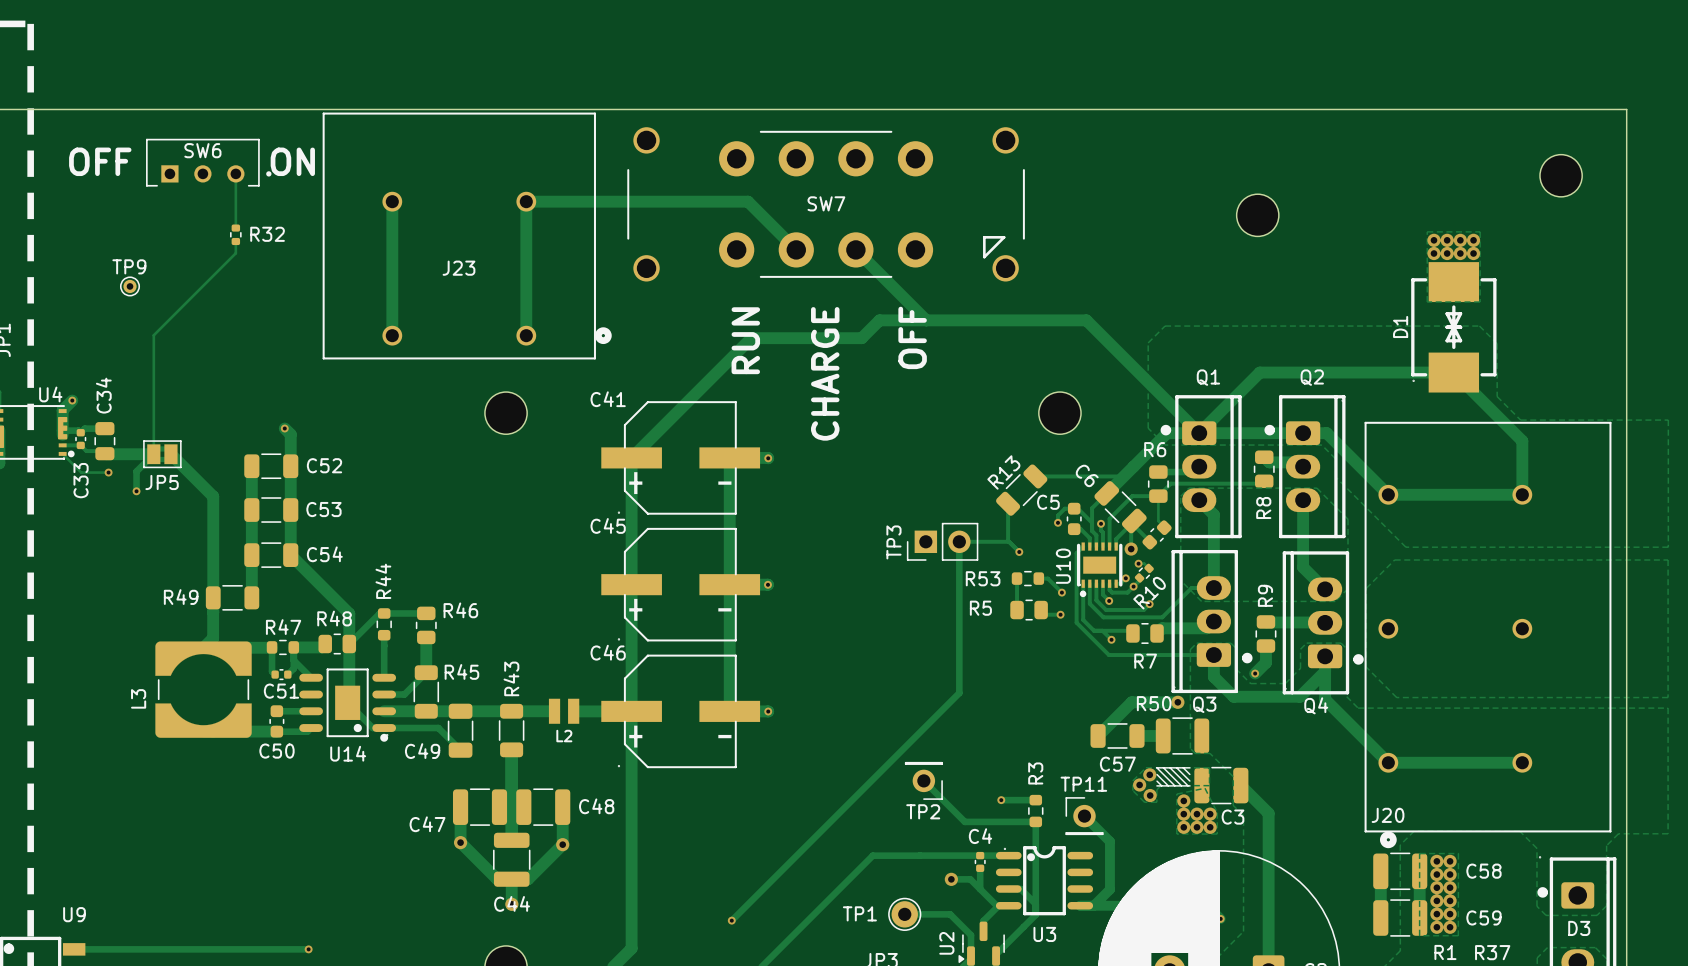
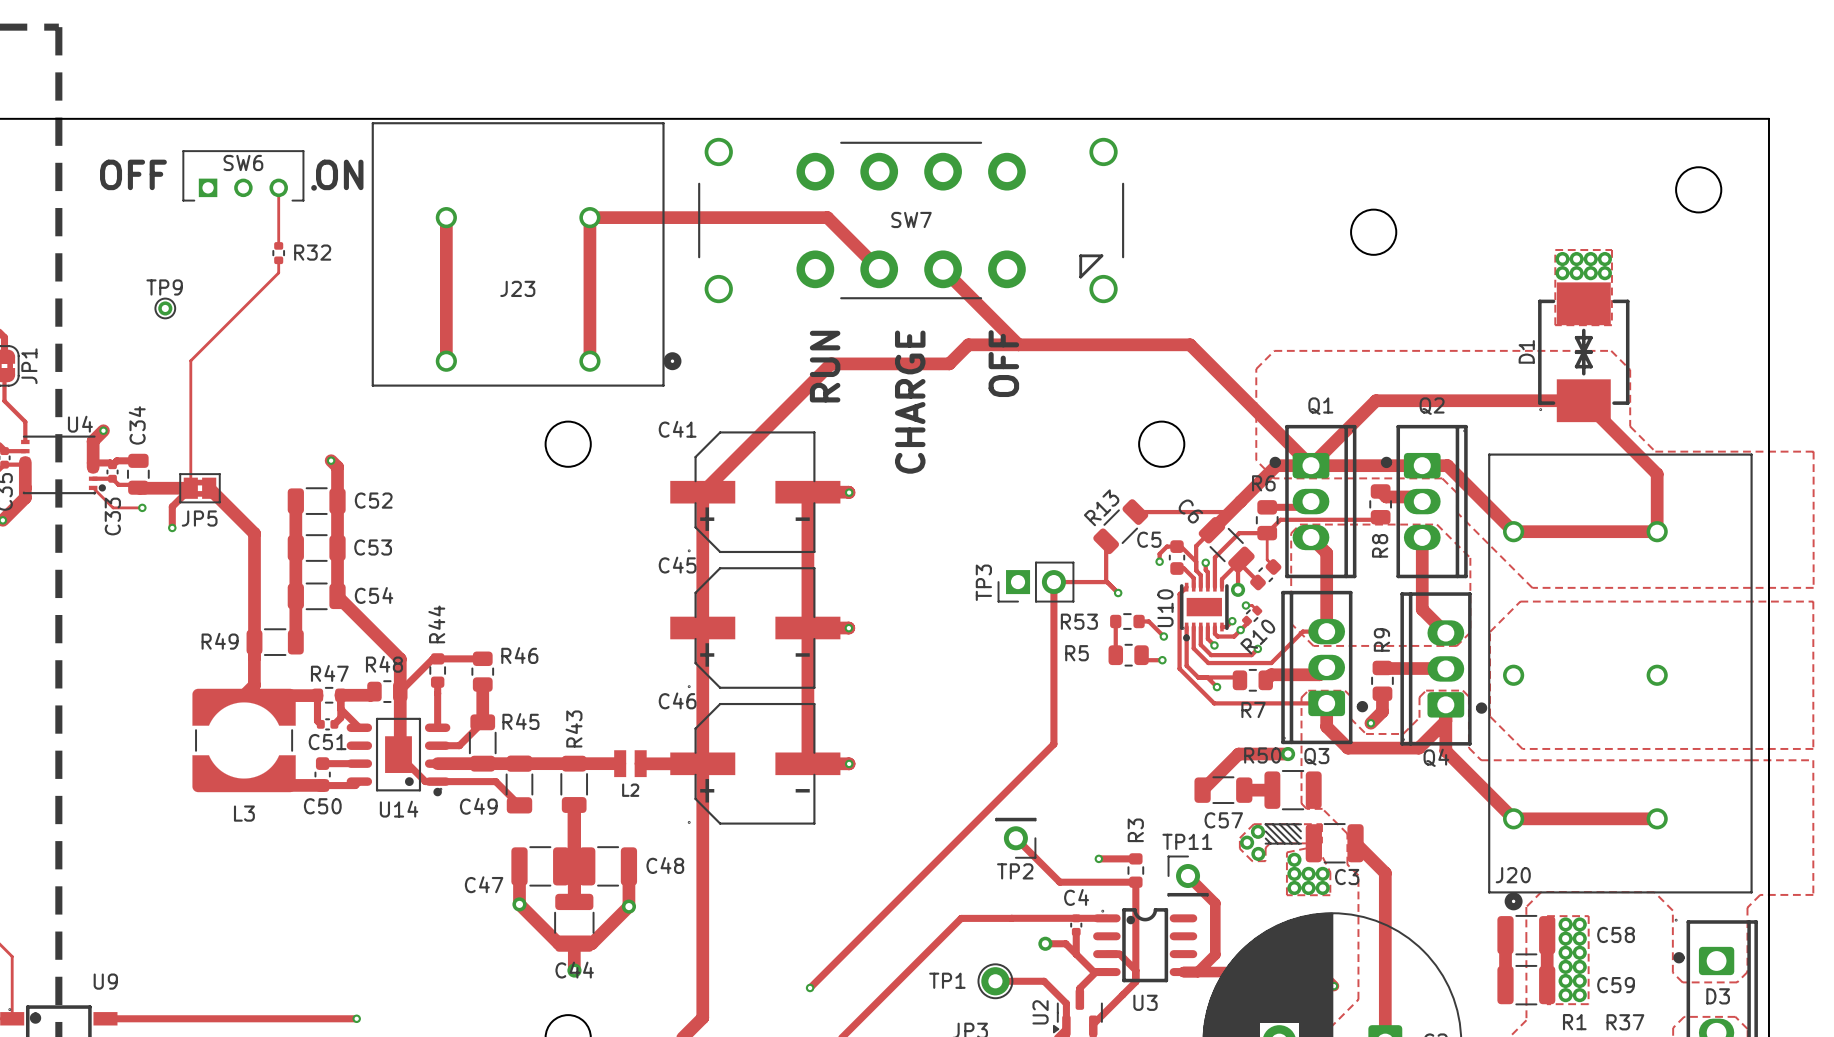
L3 name rotation: 0° (138, 698) -> 90° clockwise (244, 813)
L3 name position: L3 (138, 698) -> L3 (244, 813)

